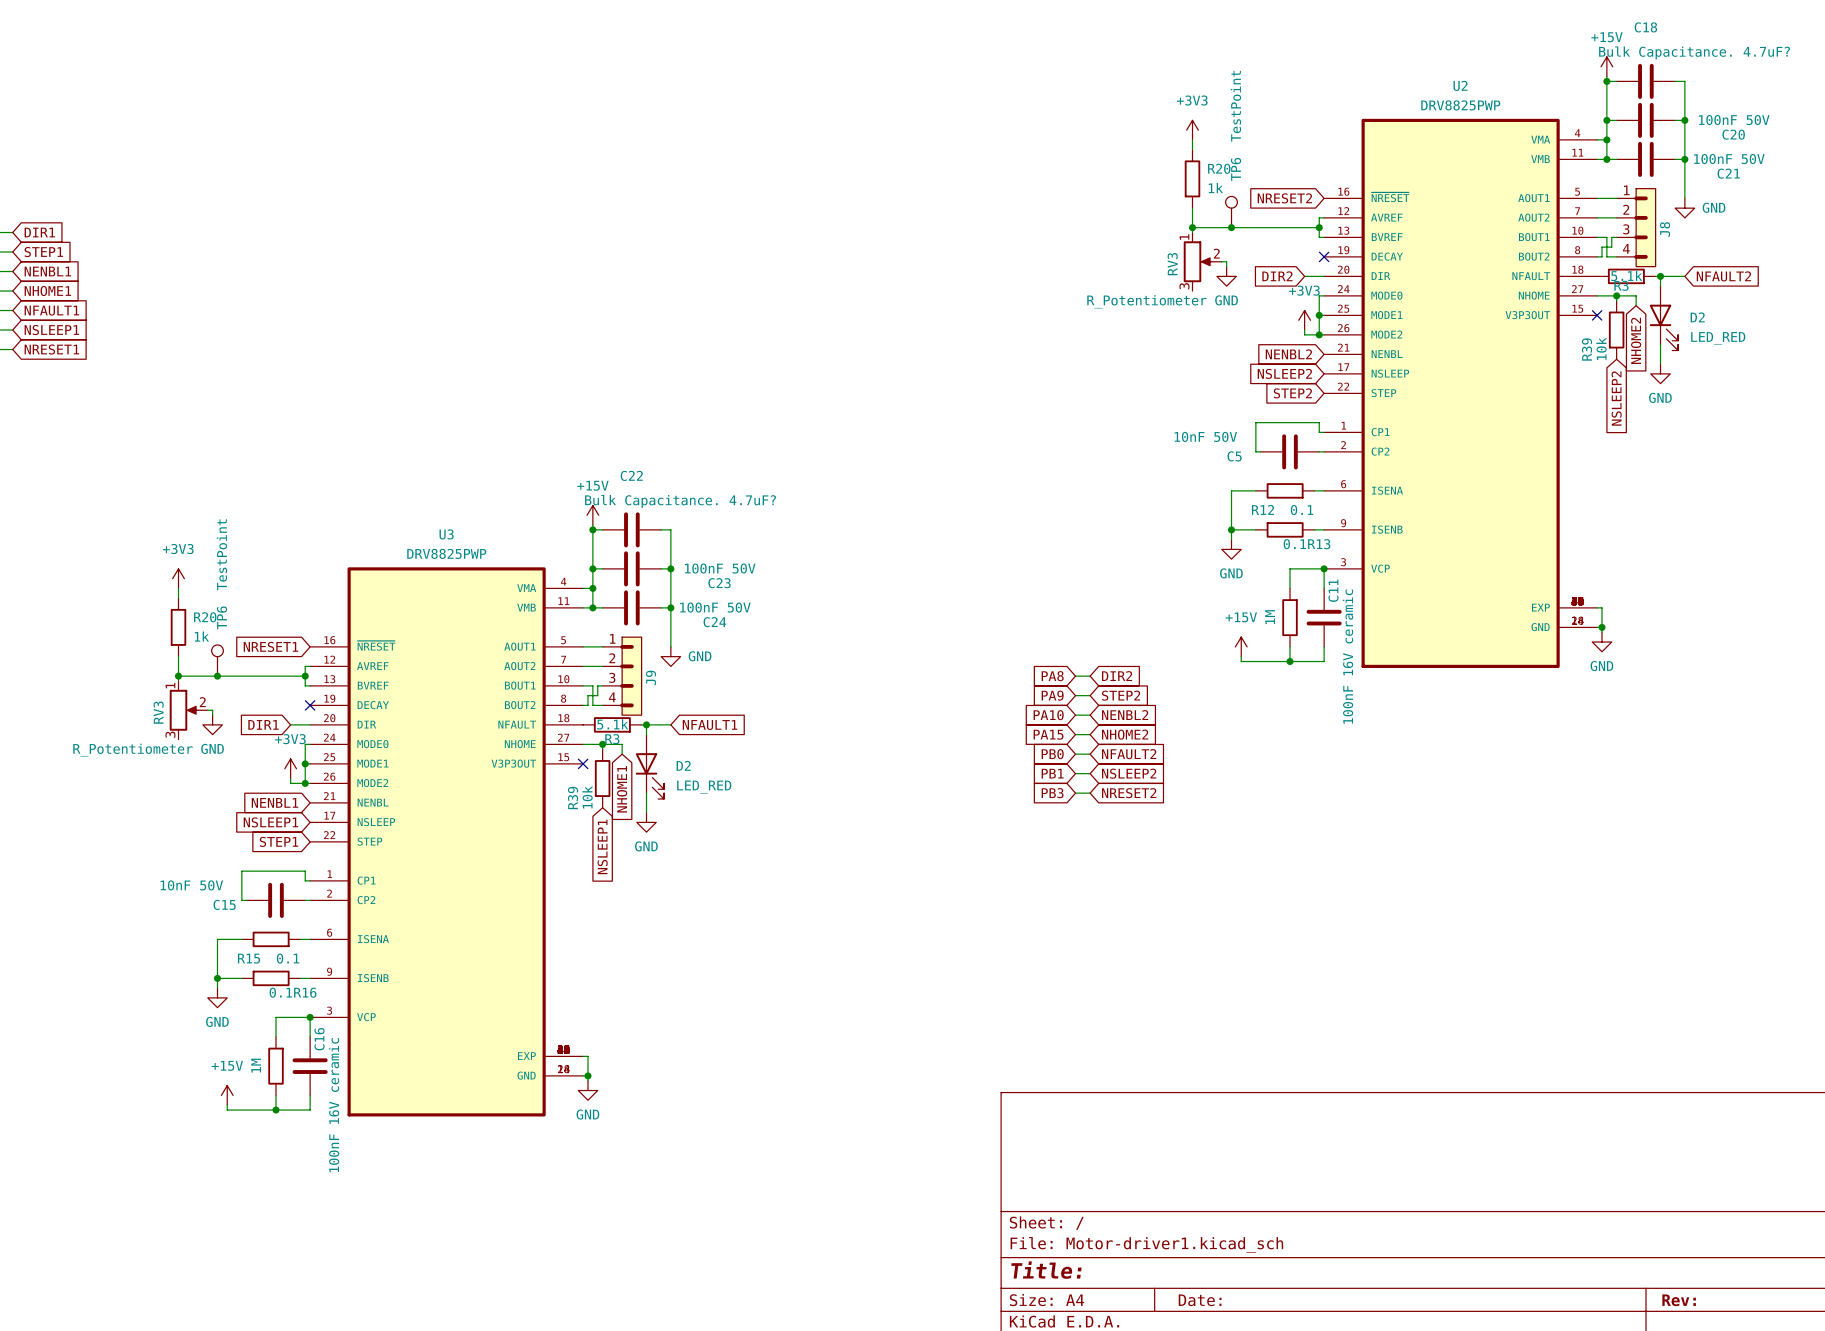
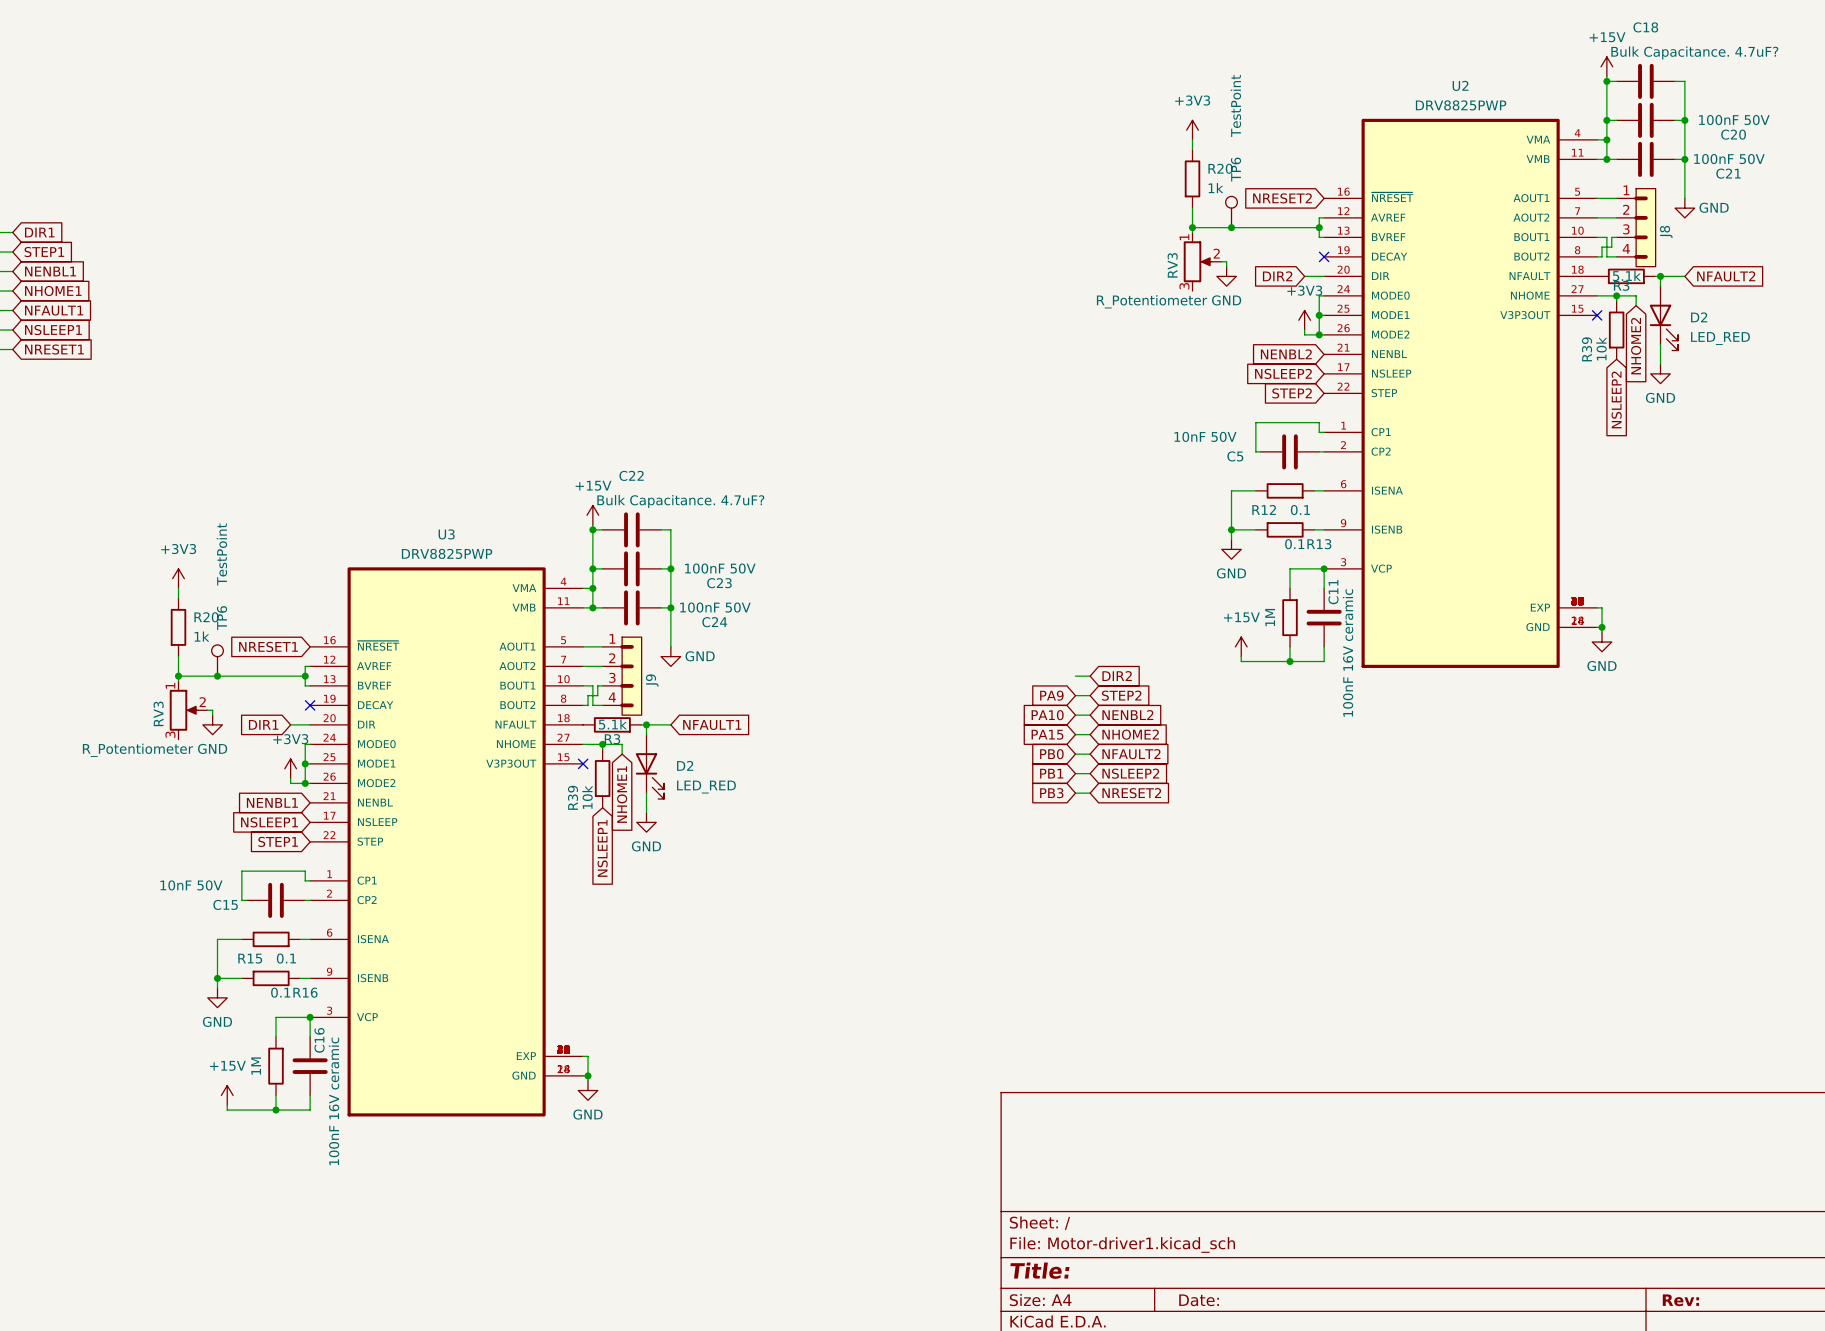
global label: PA8 (1052, 676) -> none

